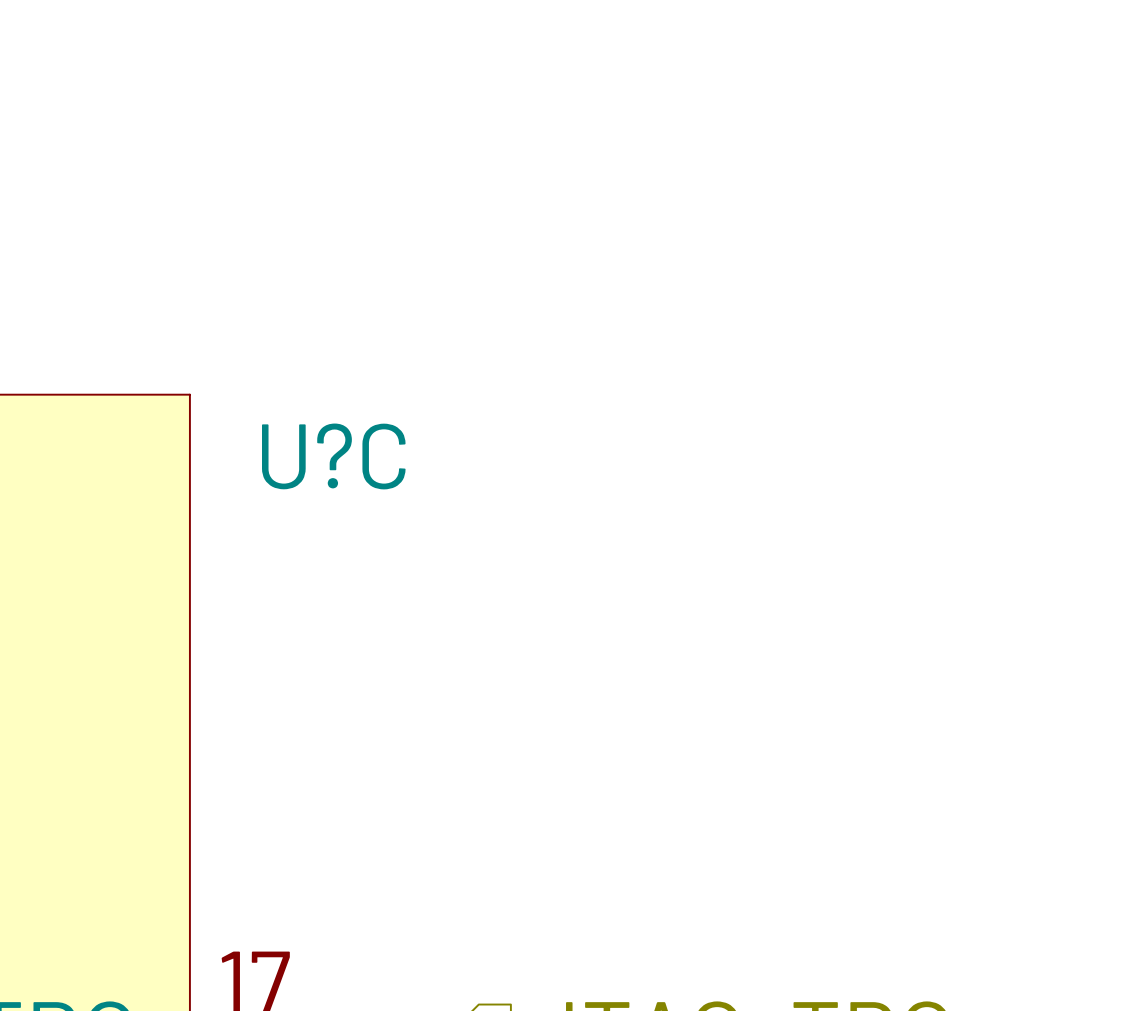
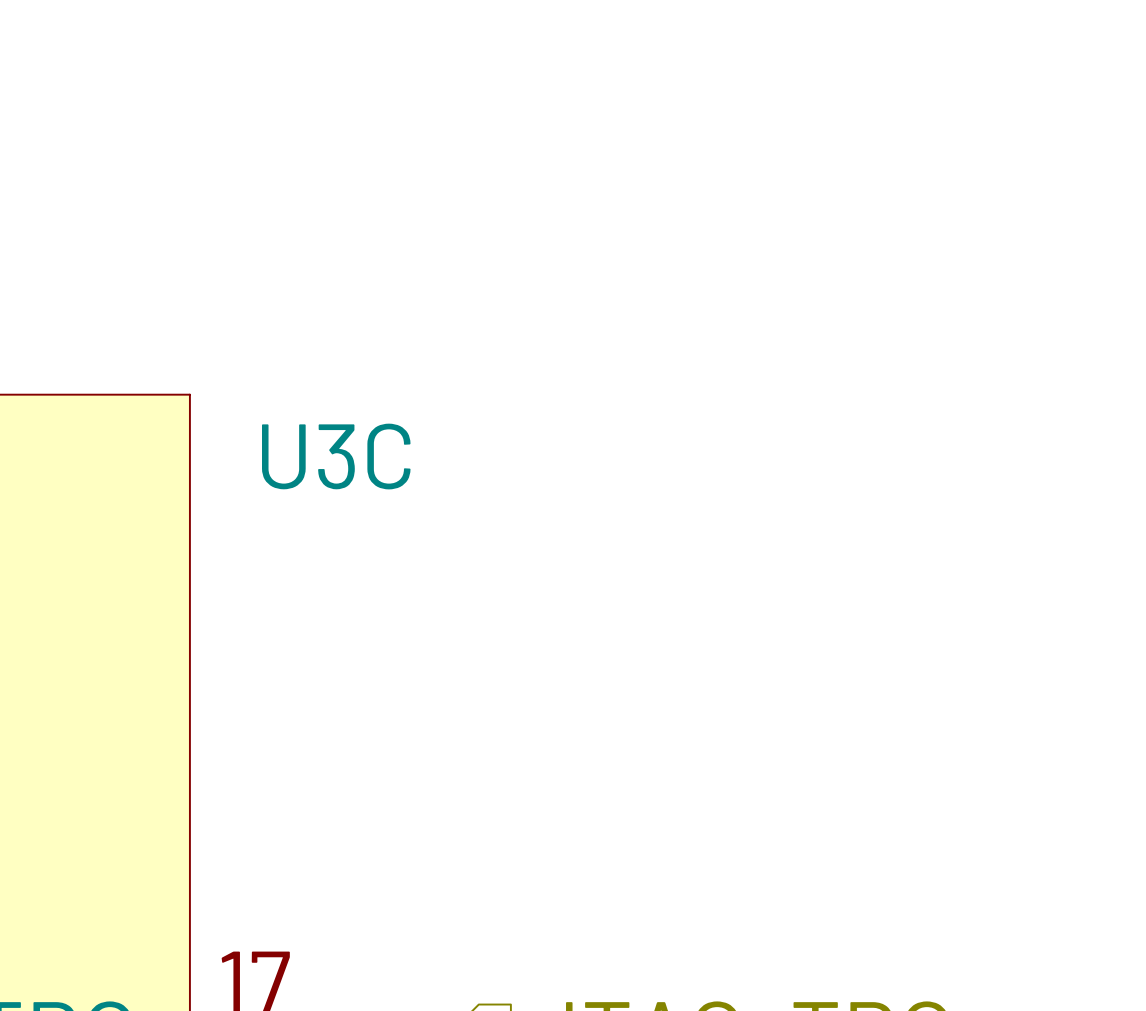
U?C name: U?C (333, 456) -> U3C (336, 456)

